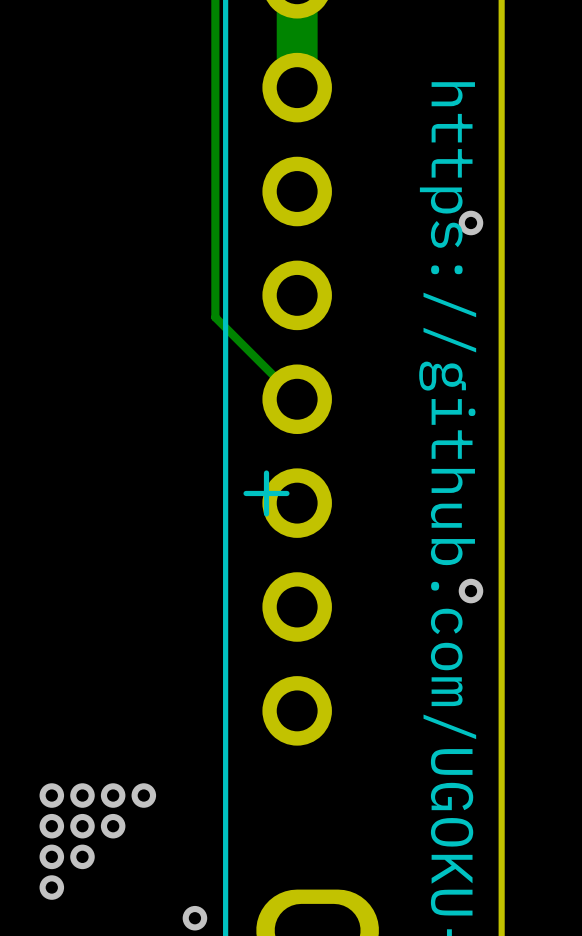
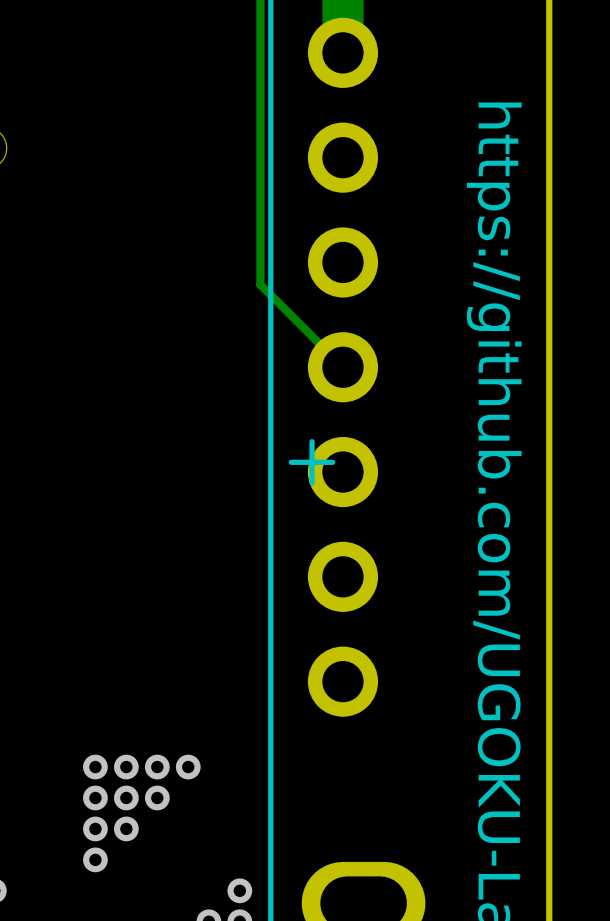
via: (470, 222) -> none
via: (470, 591) -> none

